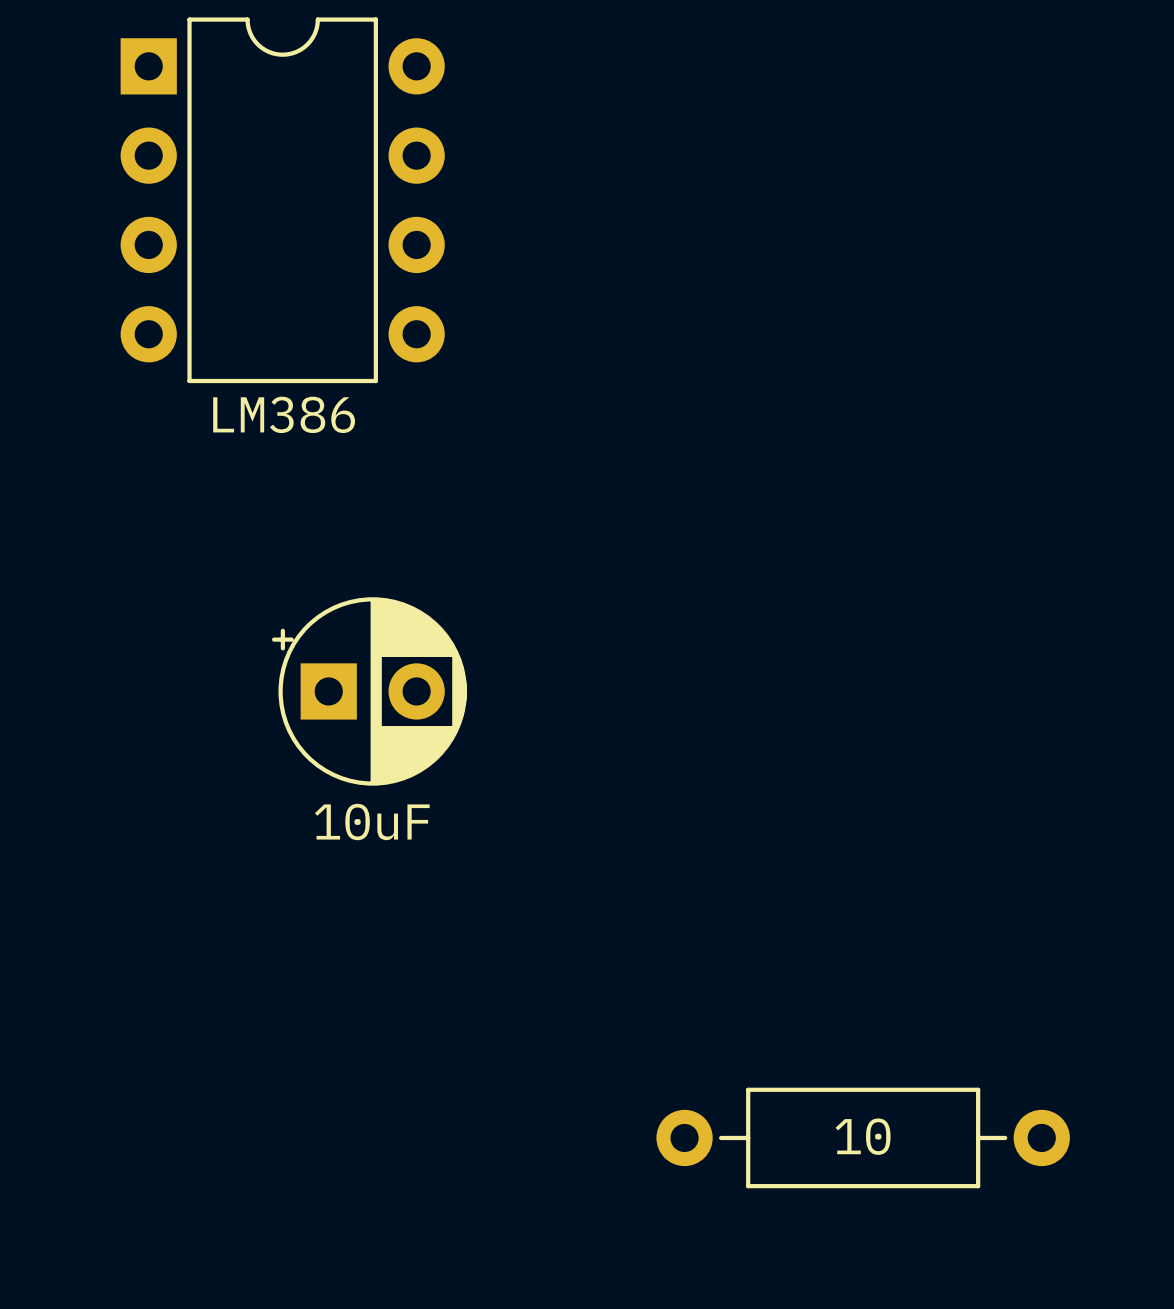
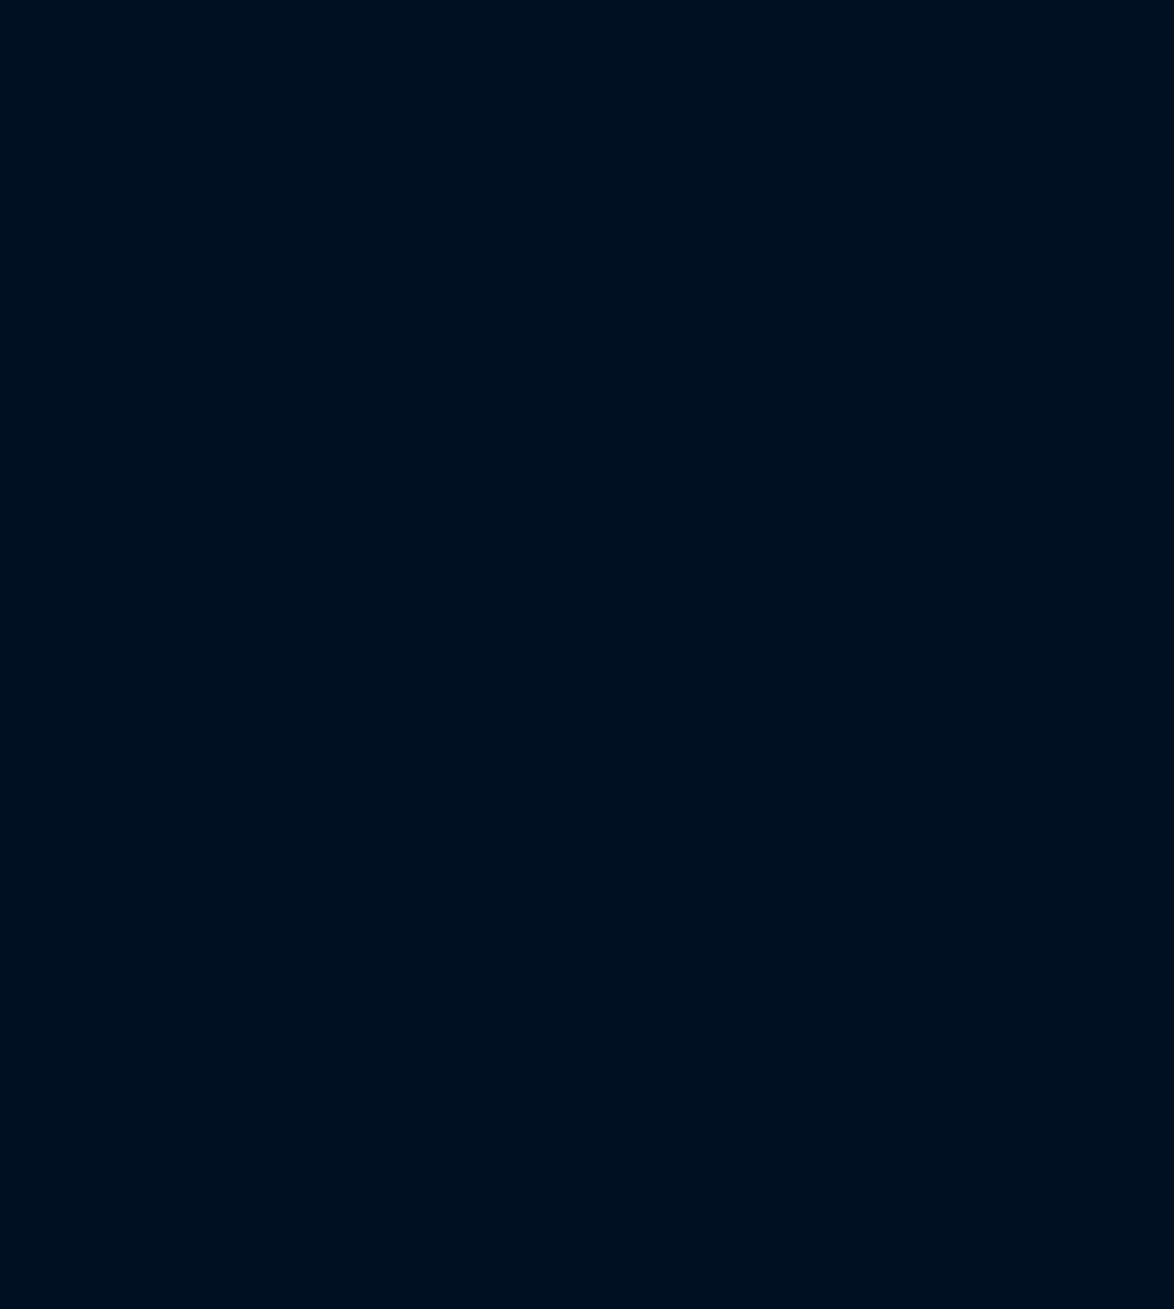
part: LM386 (282, 200) -> none
part: 10uF (369, 691) -> none
part: 10 (863, 1137) -> none

